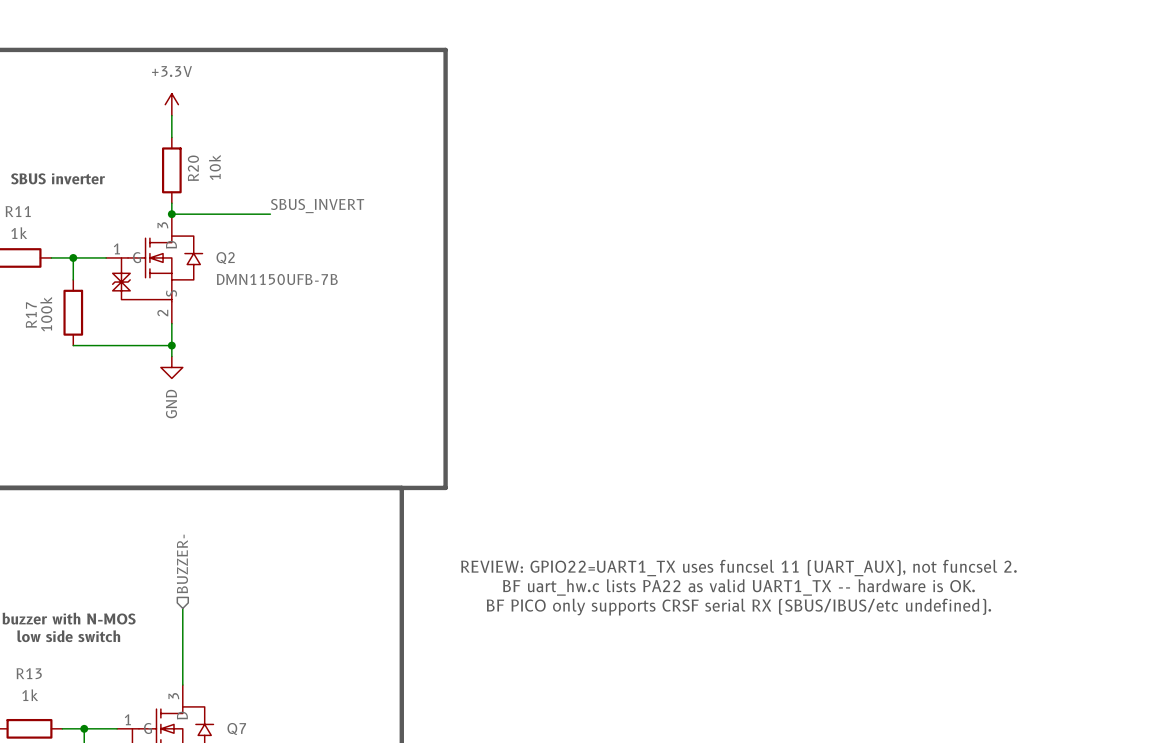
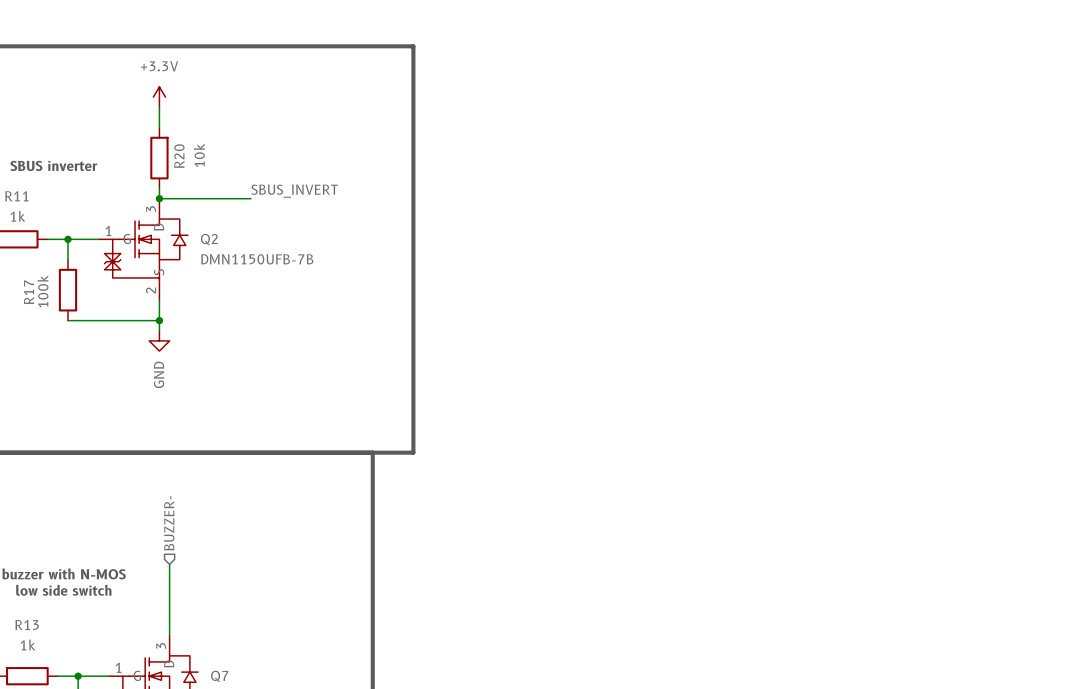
text: REVIEW: GPIO22=UART1_TX uses funcsel 11 (UART_AUX), not funcsel 2. (738, 568) -> none
text: BF uart_hw.c lists PA22 as valid UART1_TX -- hardware is OK. (738, 587) -> none
text: BF PICO only supports CRSF serial RX (SBUS/IBUS/etc undefined). (738, 607) -> none

